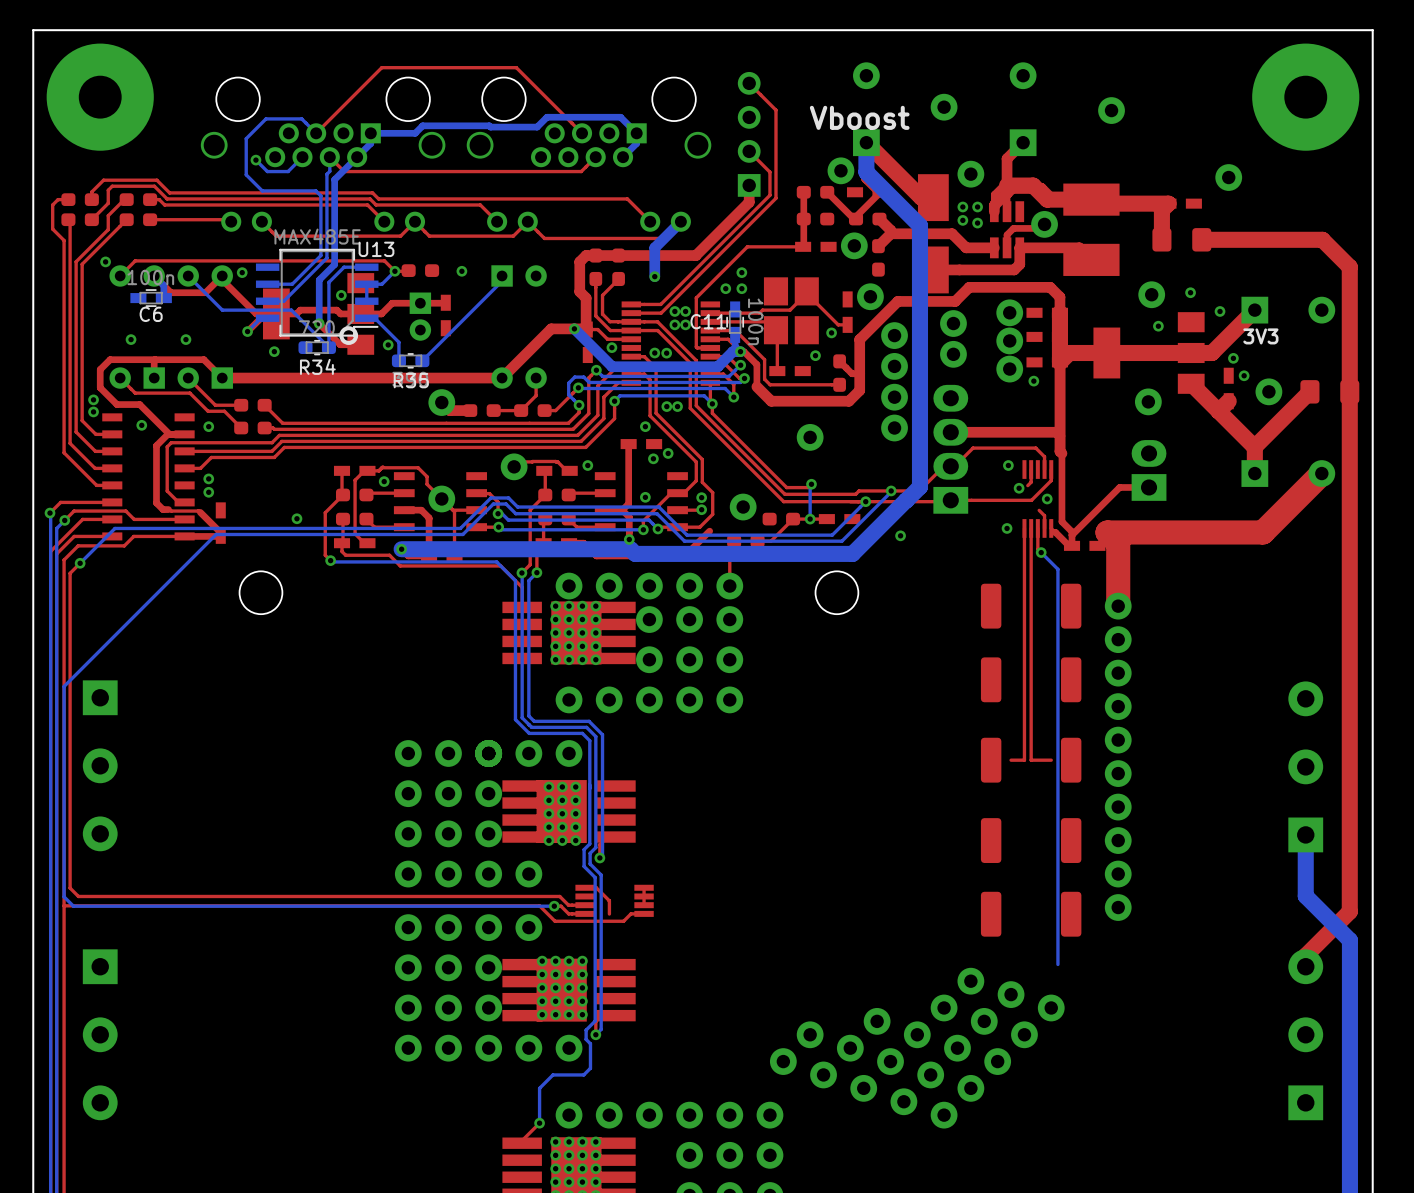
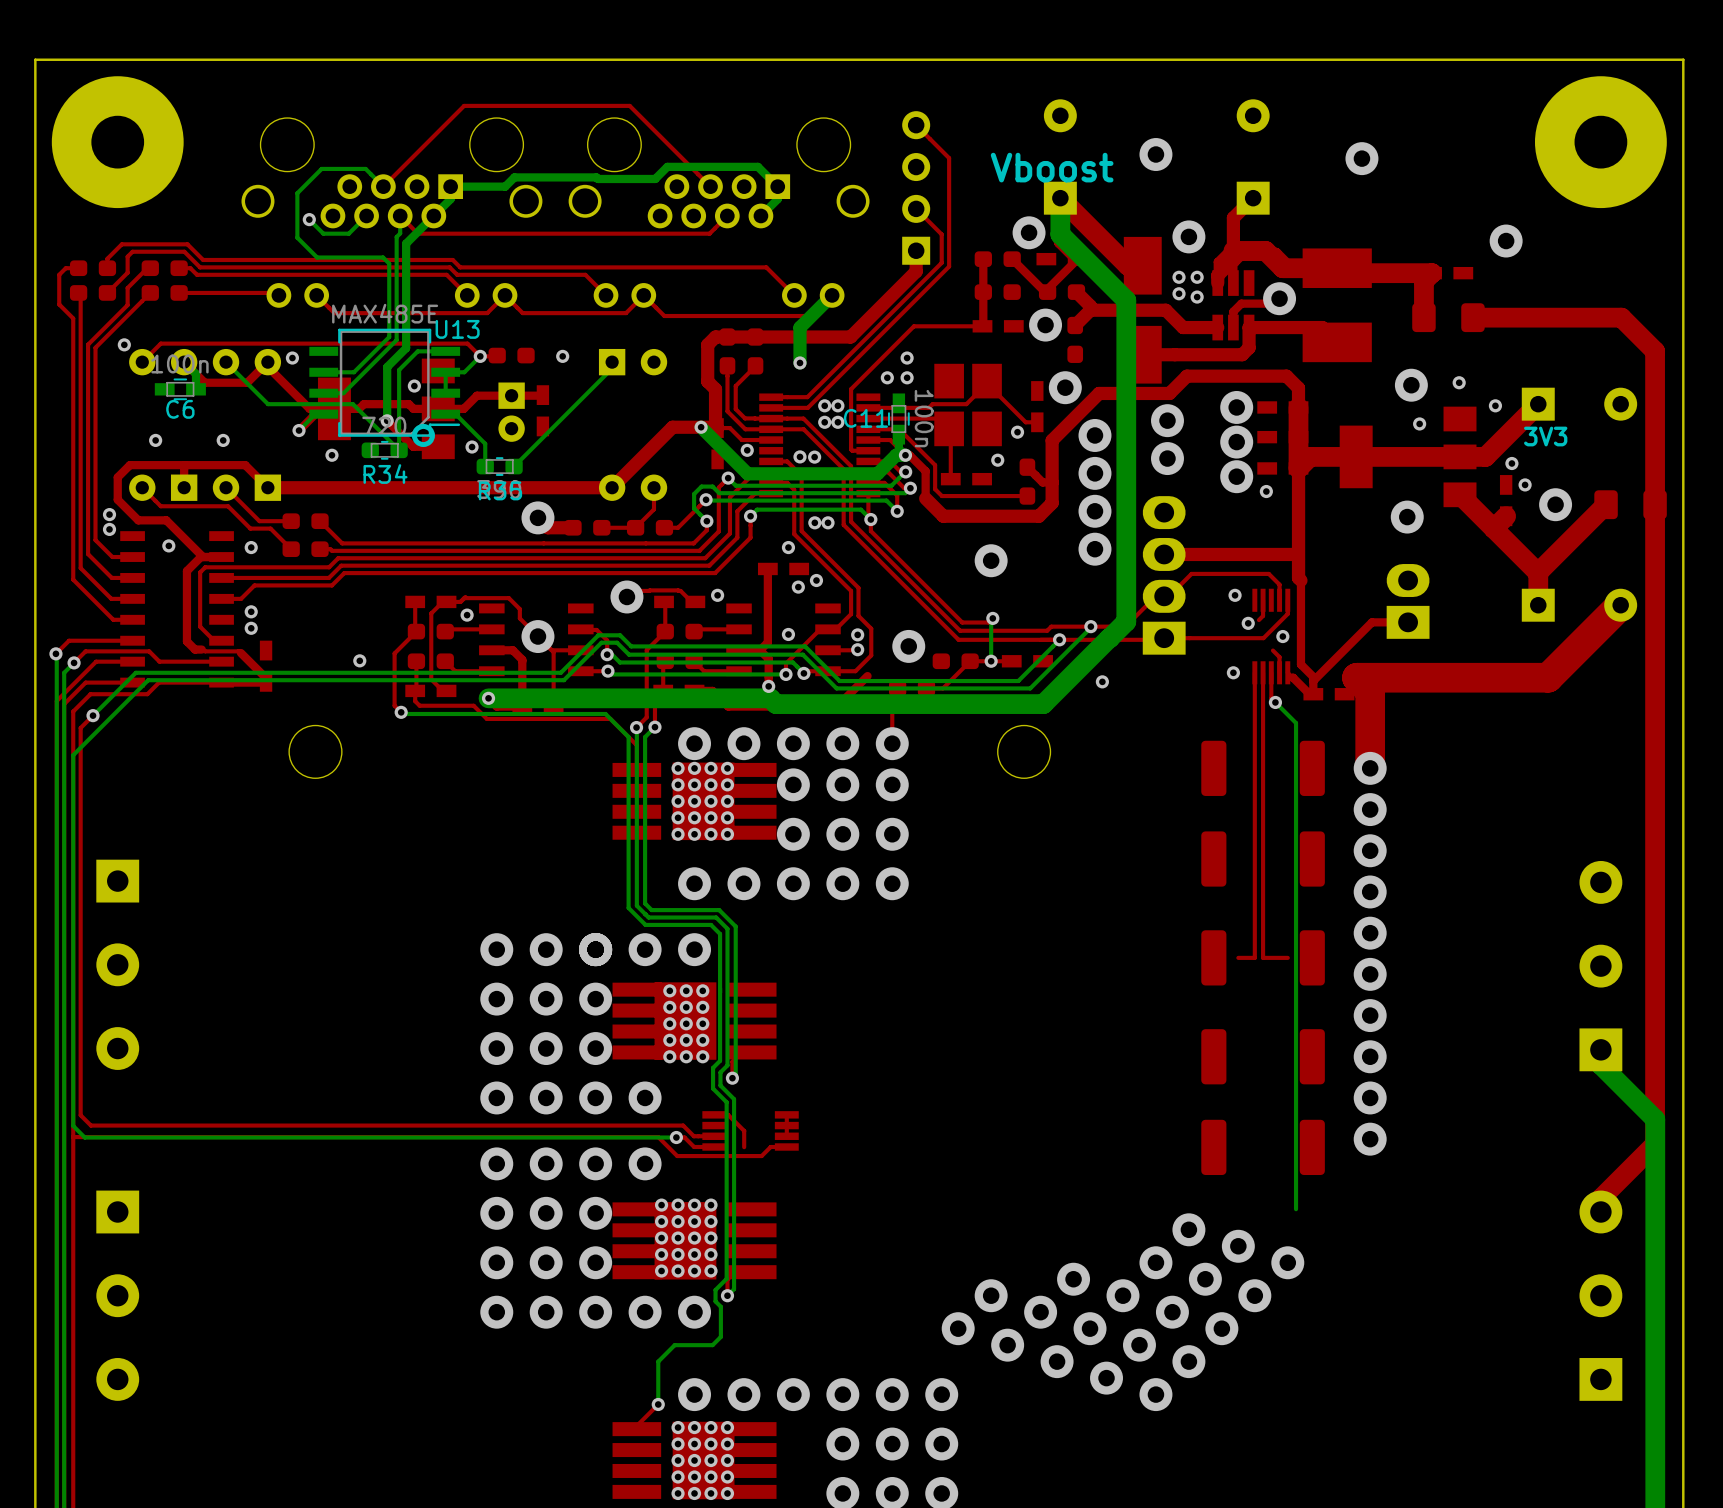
bottom track: (216, 534) (64, 686) -> (260, 680) (148, 680) (73, 755) (73, 867)
bottom track: (1305, 847) (1305, 896) (1349, 940) -> (1600, 1065) (1655, 1119) (1655, 1179)

